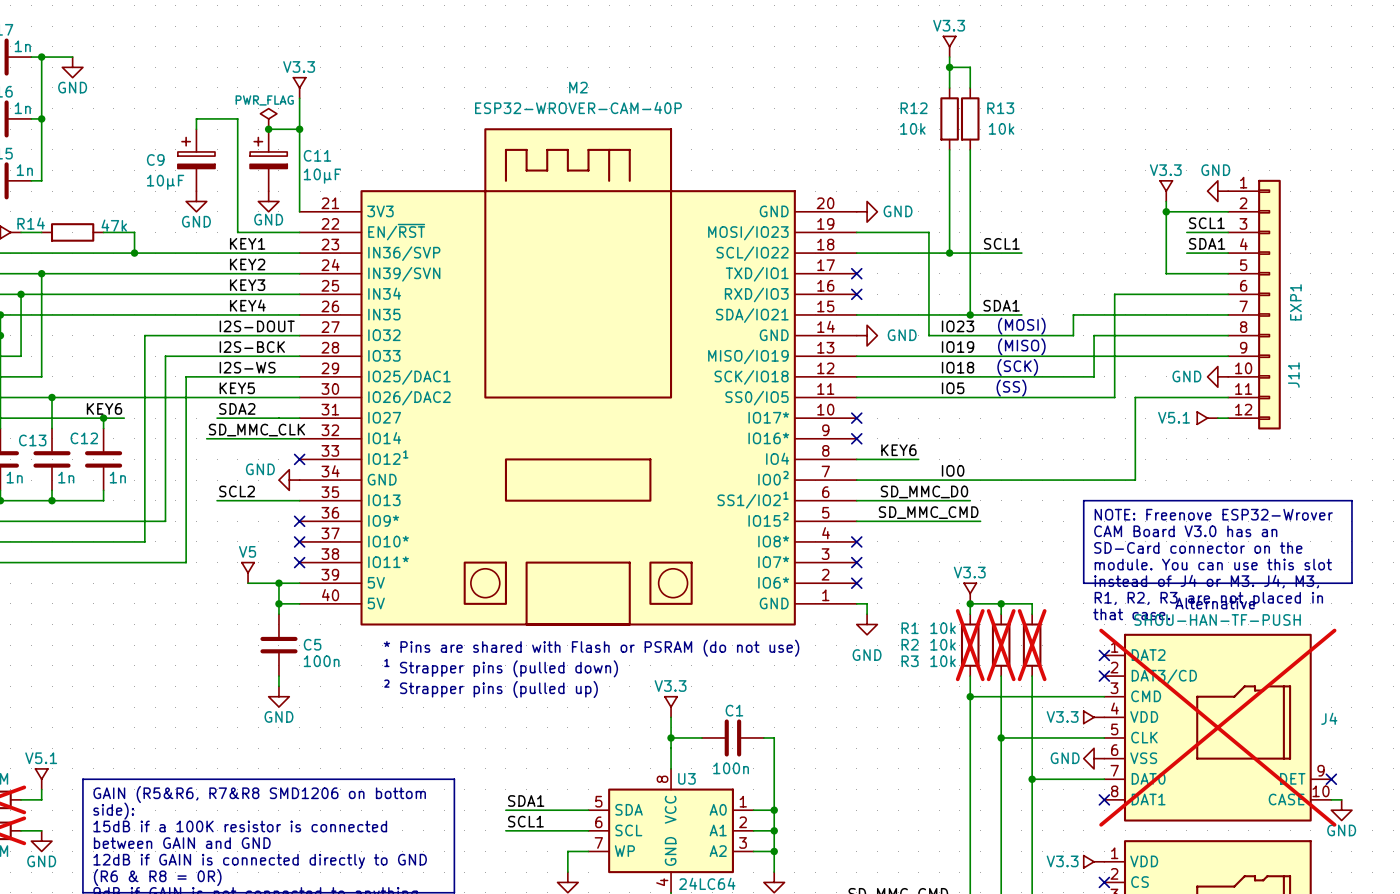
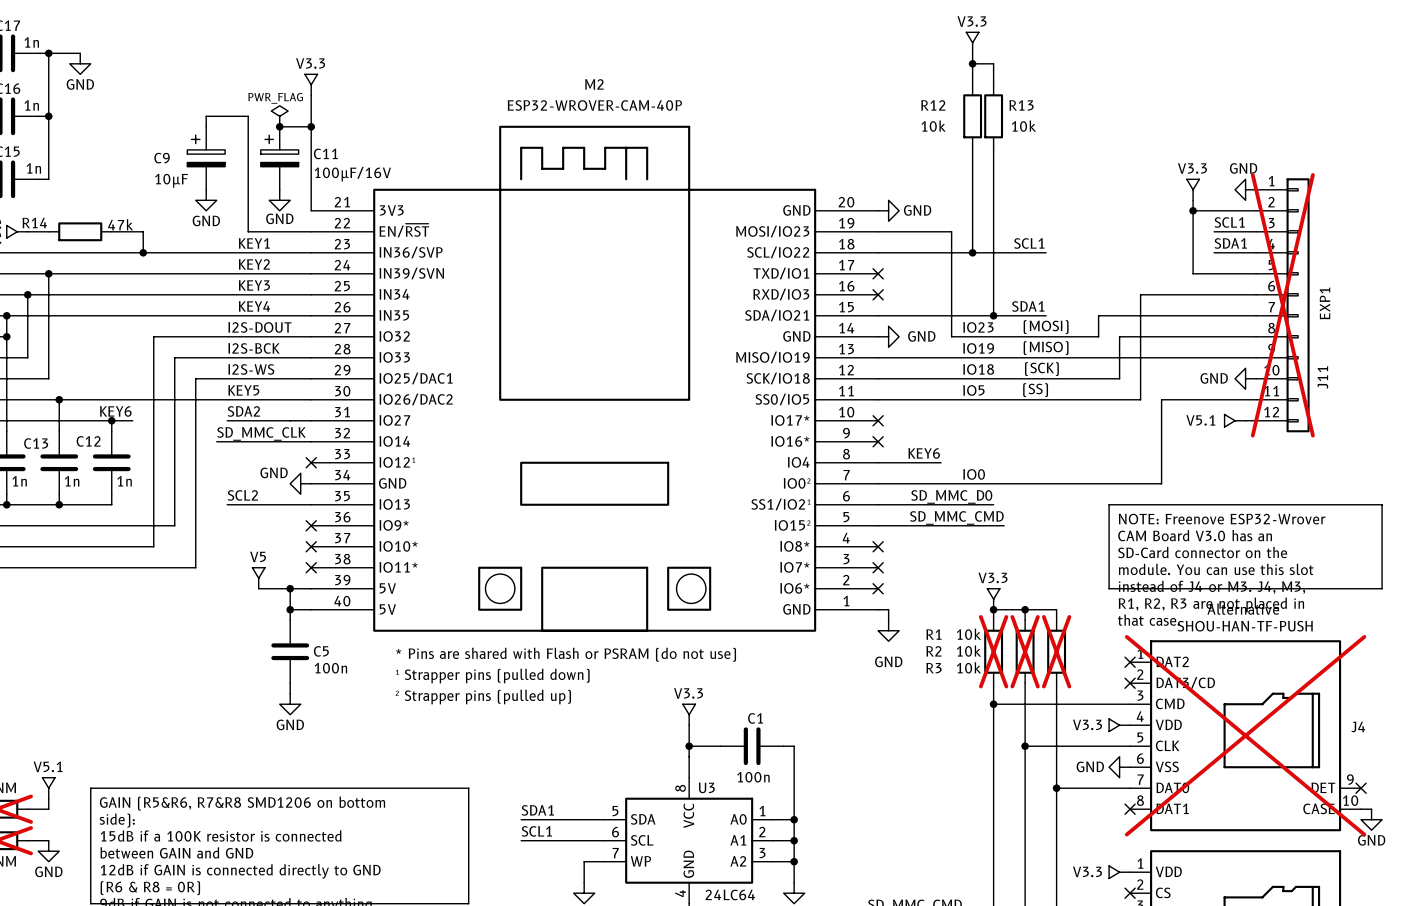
C11 value: 10µF (322, 176) -> 100µF/16V (352, 174)
J11 do-not-place cross: none -> (1282, 305)

